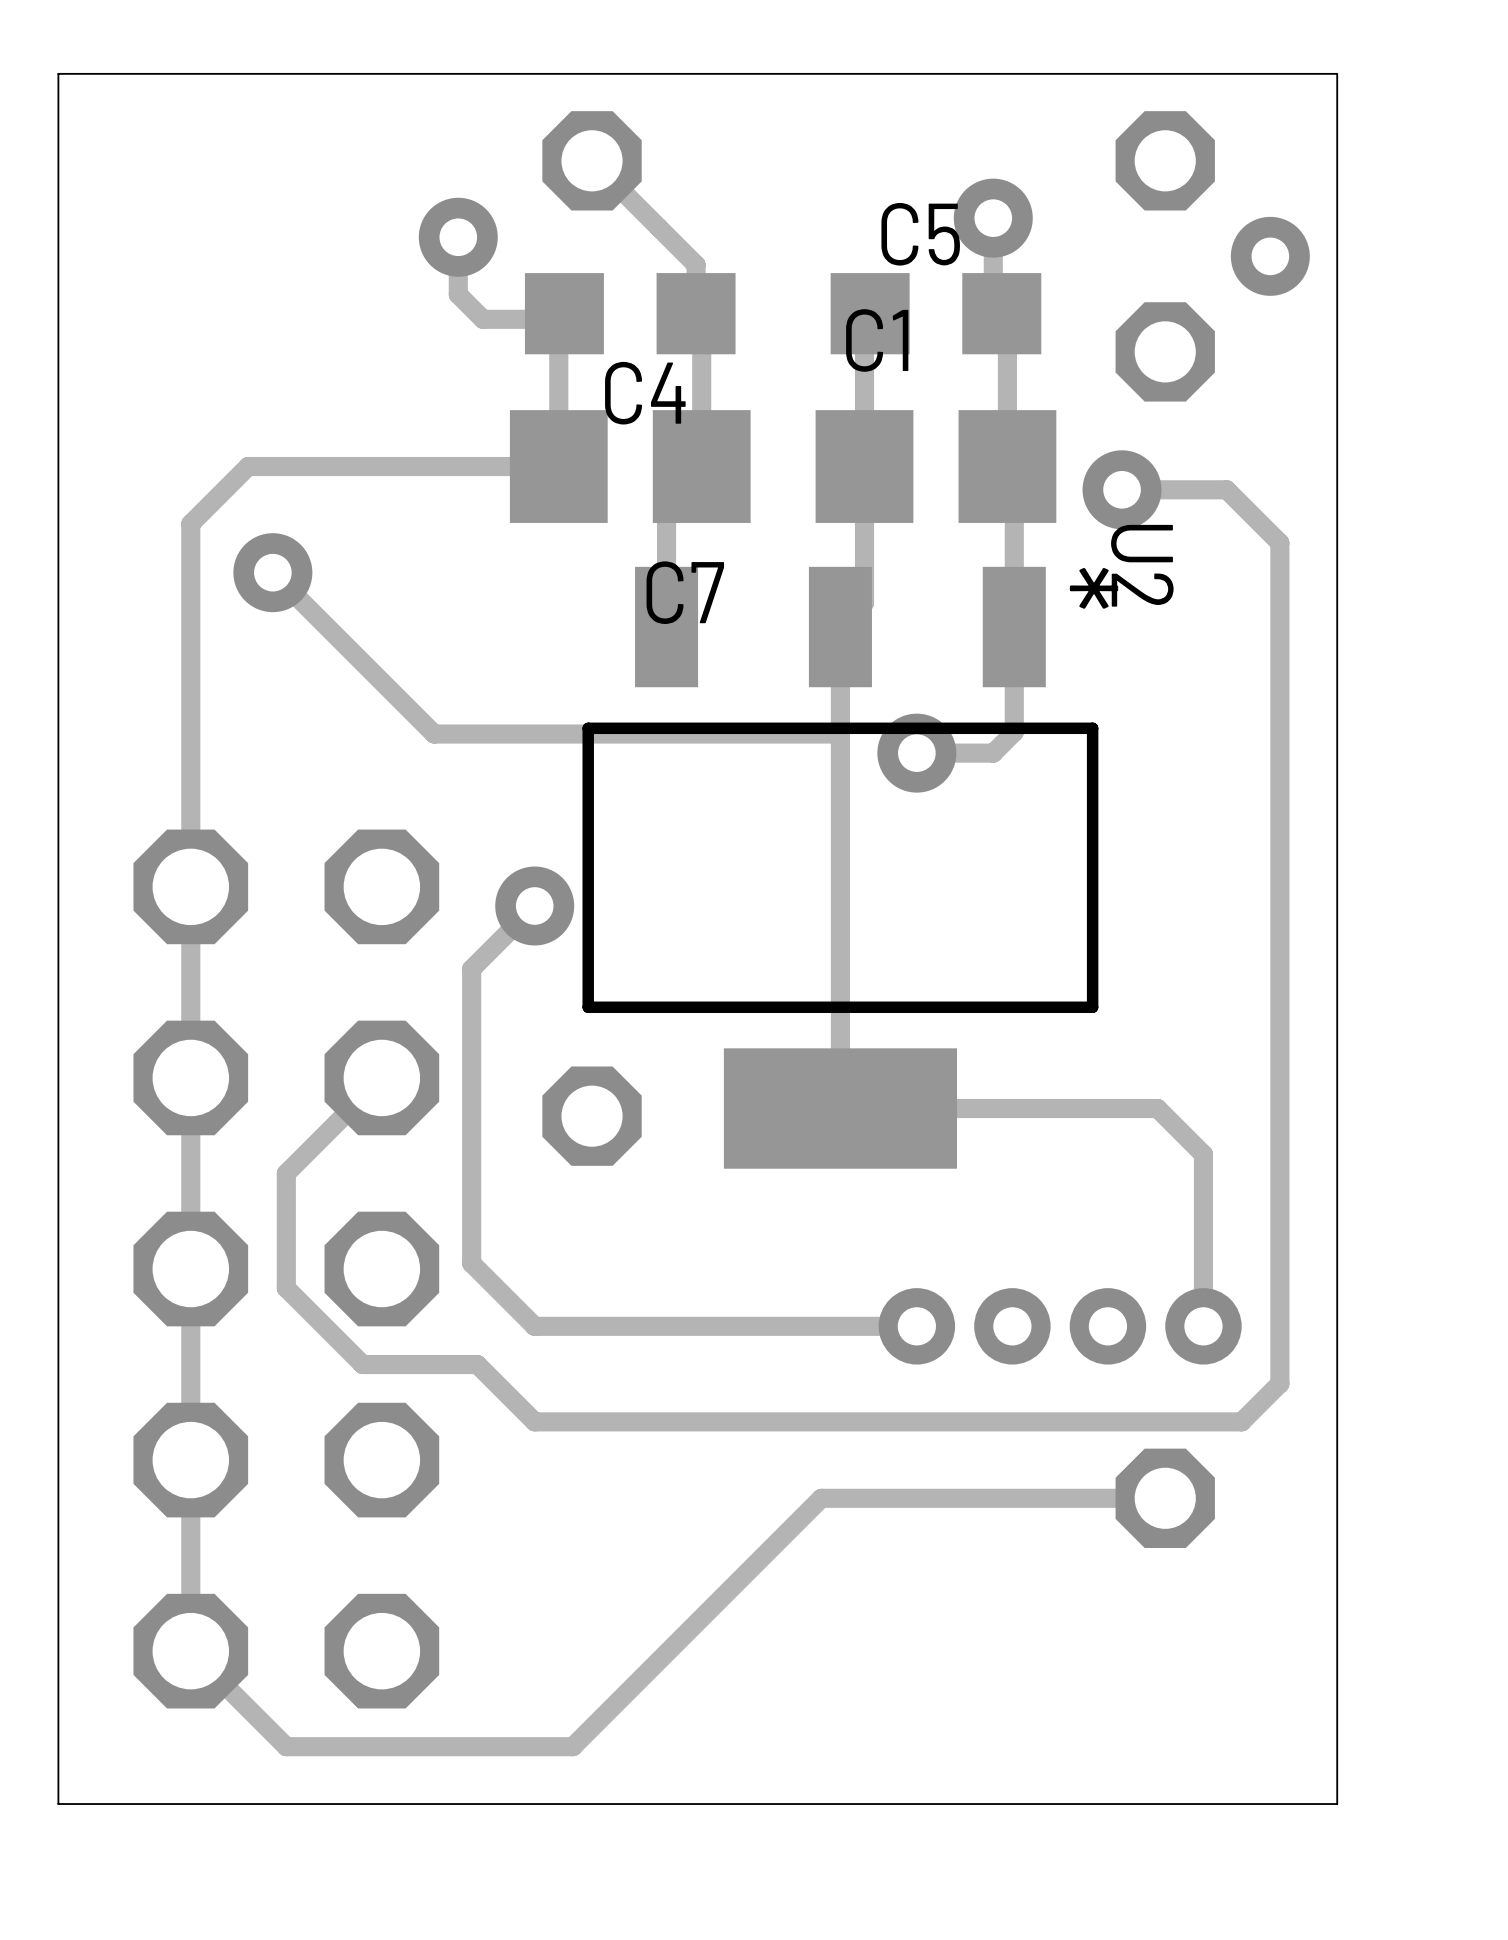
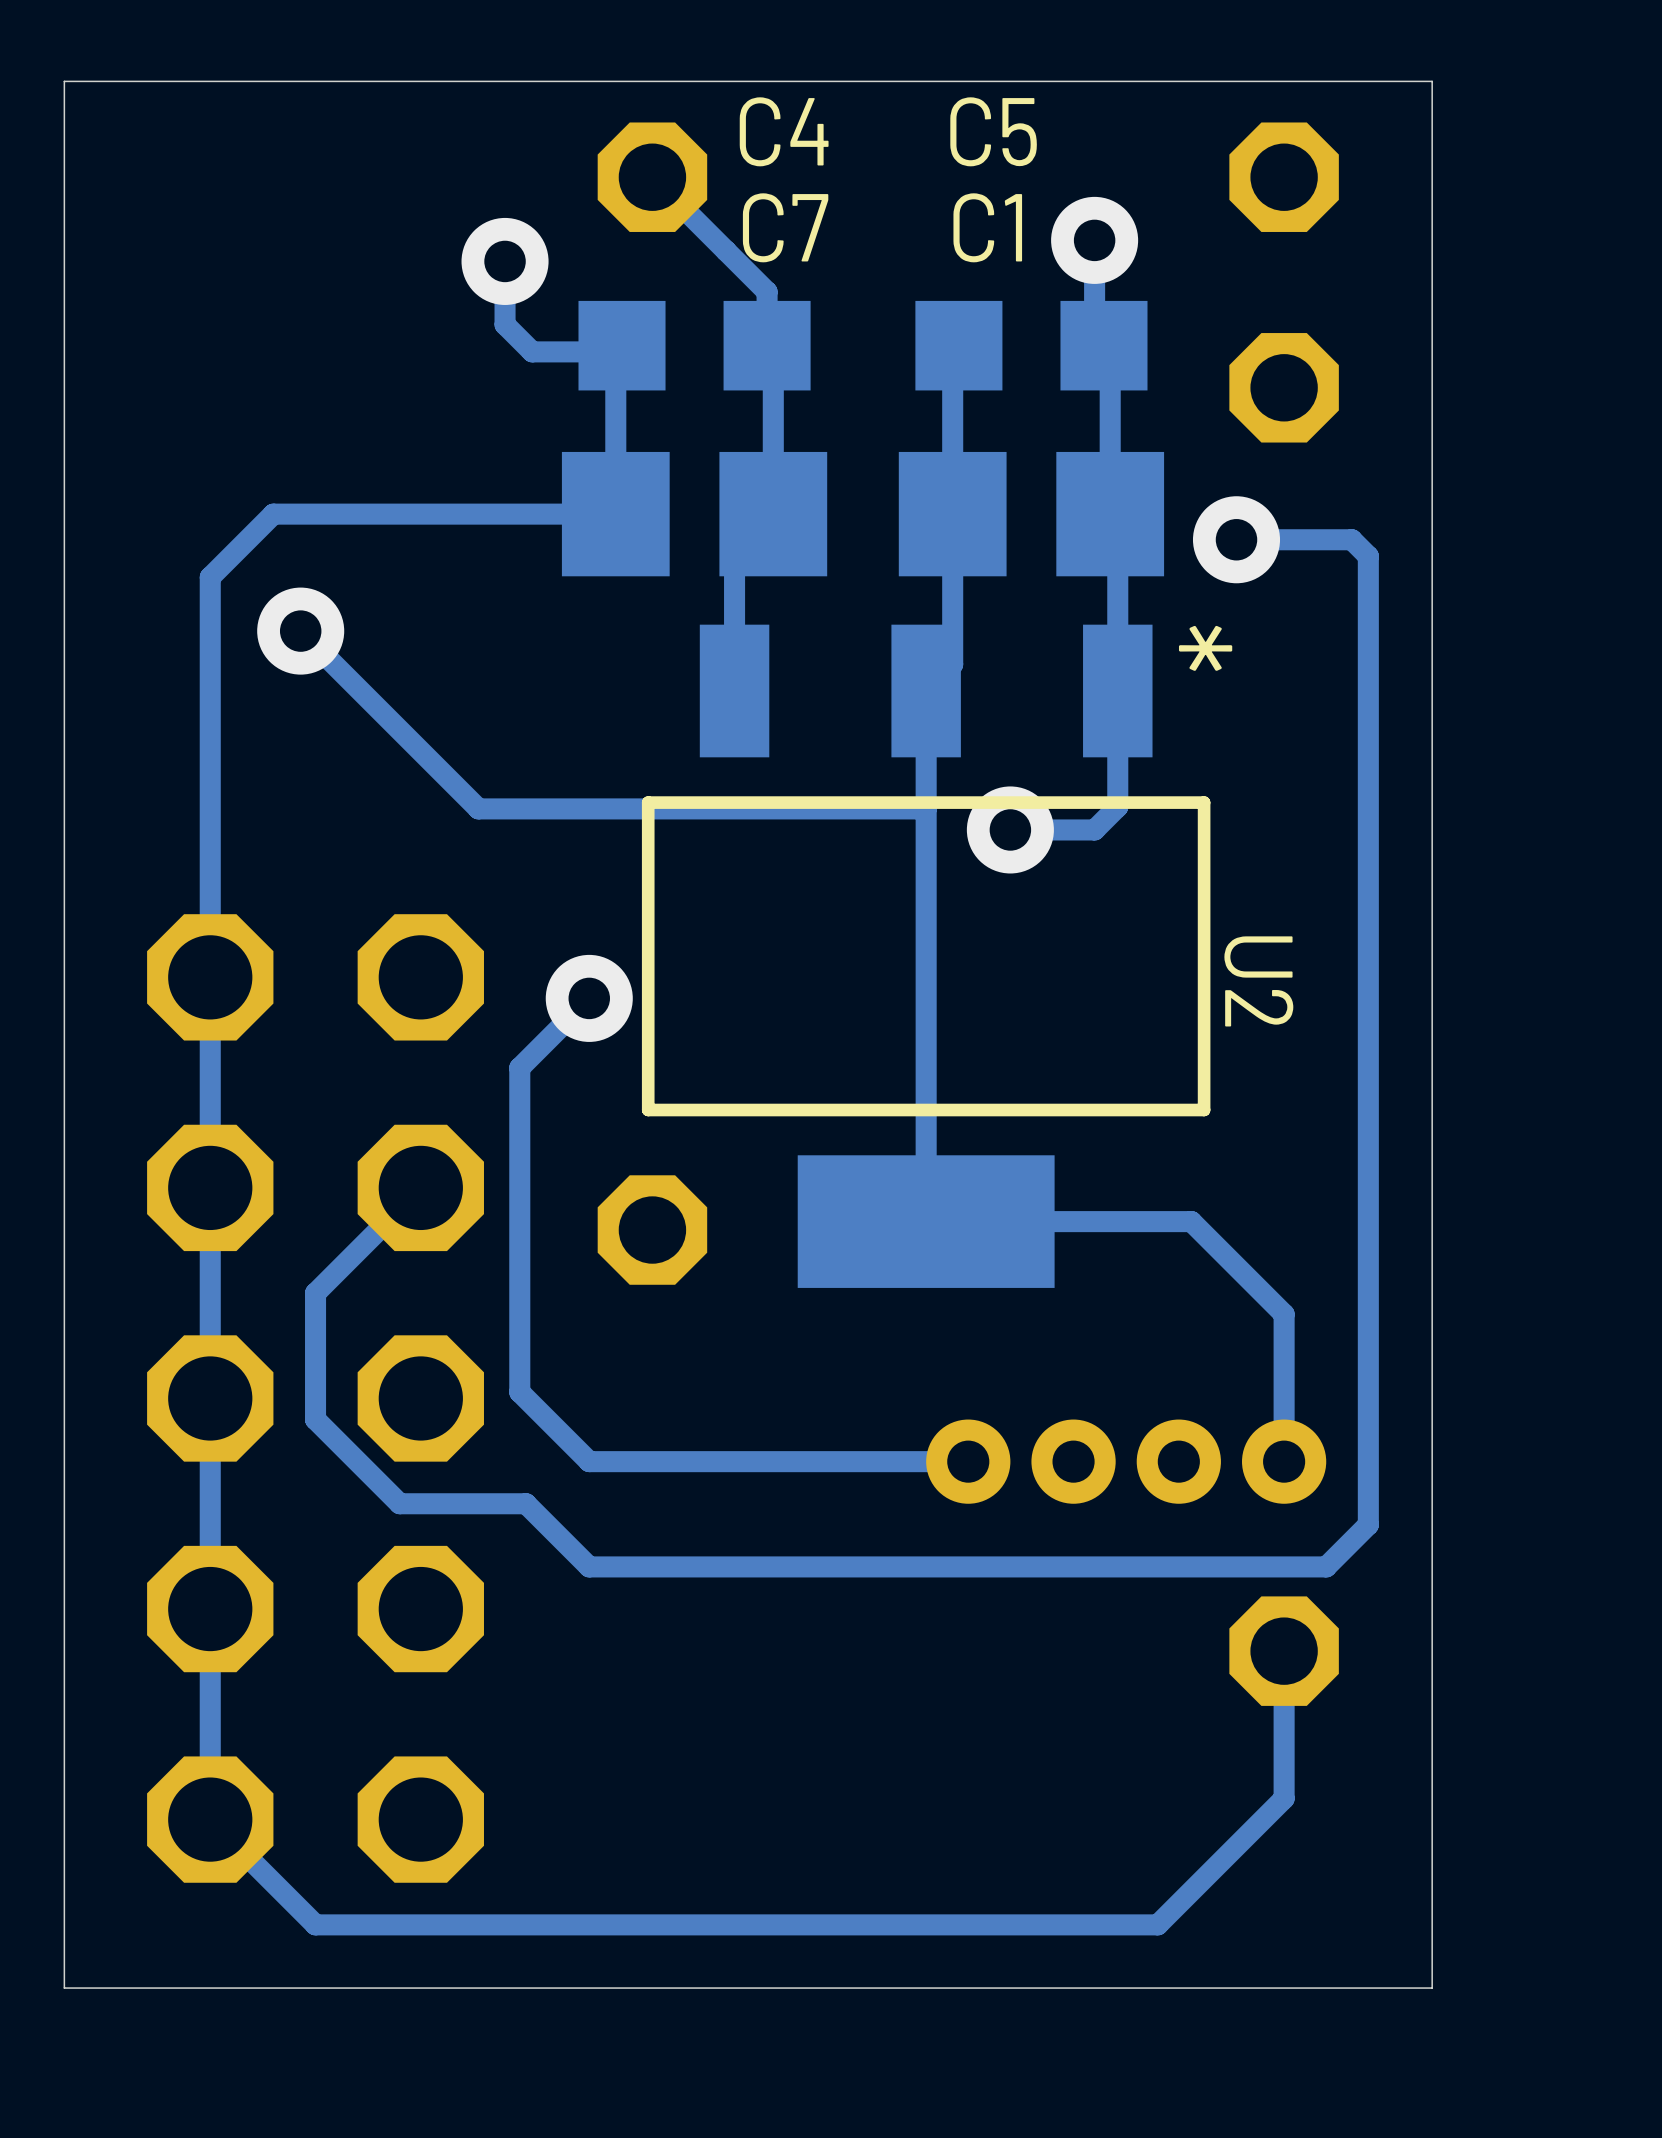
board edge: (1299, 73) (1337, 73) (1337, 1804) (1299, 1804) -> (1432, 81) (1432, 1988)
C5 name position: C5 (920, 234) -> C5 (993, 131)
via: (1270, 256) -> none
C1 name position: C1 (877, 340) -> C1 (987, 227)
C4 name position: C4 (645, 393) -> C4 (784, 131)
track: (1241, 504) (1279, 542) (1279, 1383) (1241, 1421) (1203, 1421) -> (1368, 556) (1368, 1524) (1326, 1566)
U2 name position: U2 (1142, 565) -> U2 (1258, 981)
C7 name position: C7 (685, 592) -> C7 (785, 227)
track: (1081, 1108) (1157, 1108) (1203, 1154) (1203, 1326) -> (1191, 1221) (1284, 1314) (1284, 1461)
part position: (1060, 1326) -> (1126, 1461)
track: (1165, 1498) (821, 1498) (572, 1746) -> (1284, 1651) (1284, 1798) (1157, 1924) (631, 1924)

